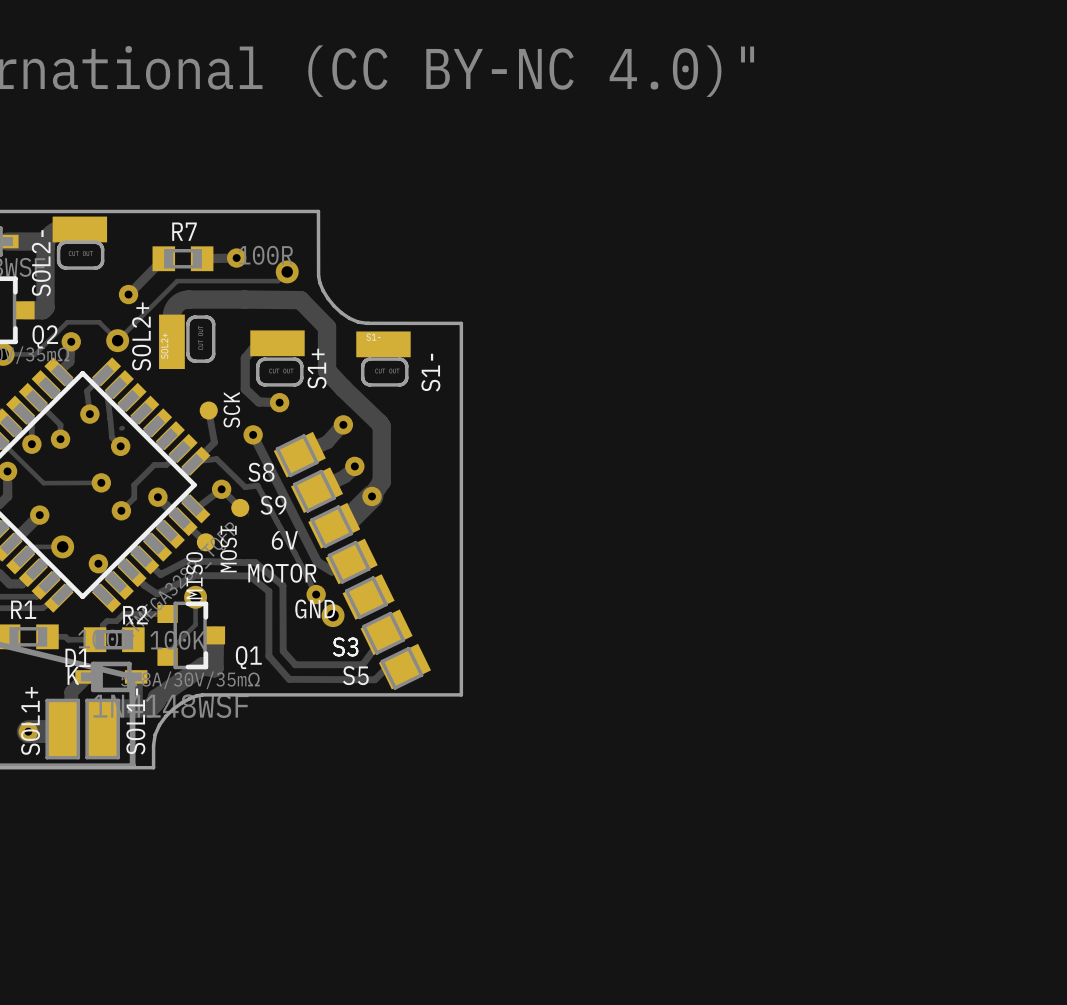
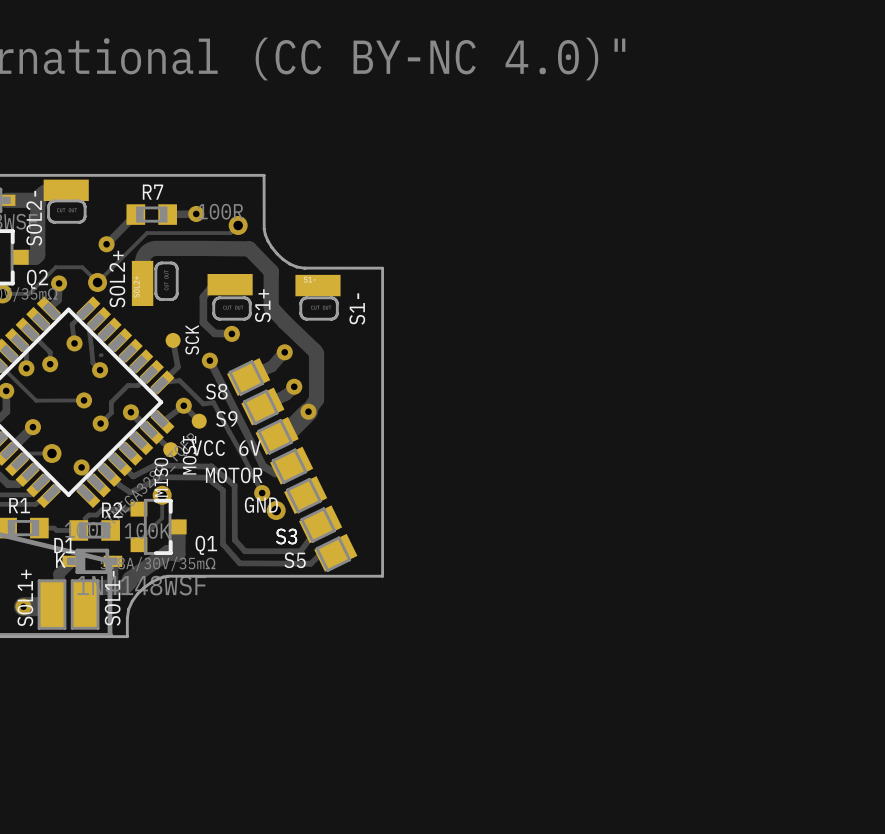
text: none -> VCC 6V (226, 448)
text: 6V (284, 540) -> none

